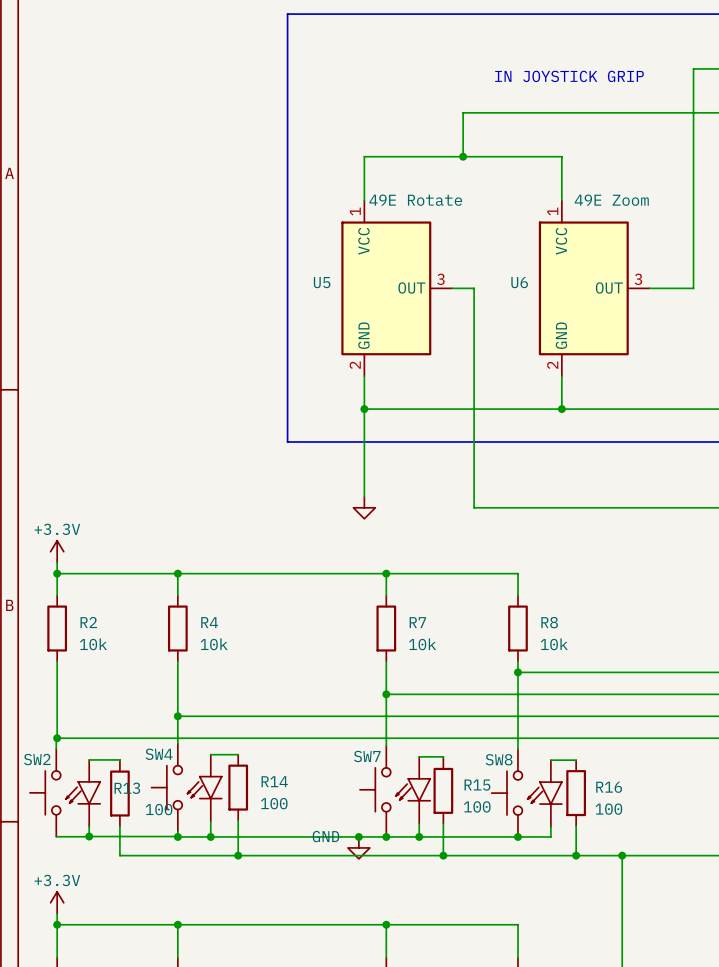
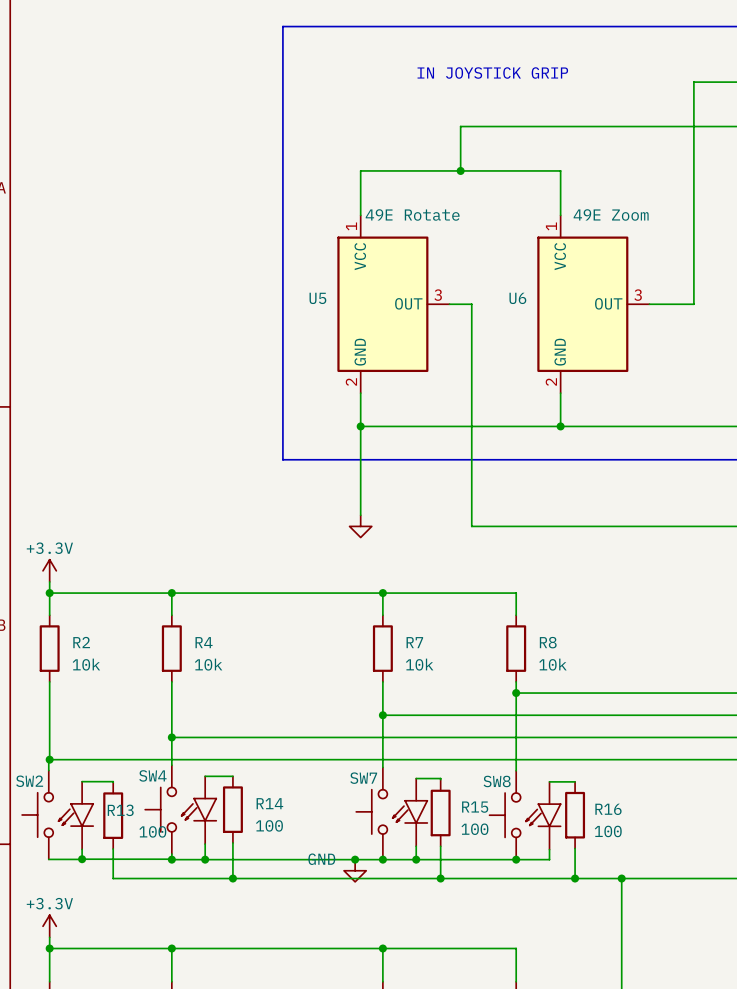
text position: IN JOYSTICK GRIP (569, 76) -> IN JOYSTICK GRIP (492, 73)

